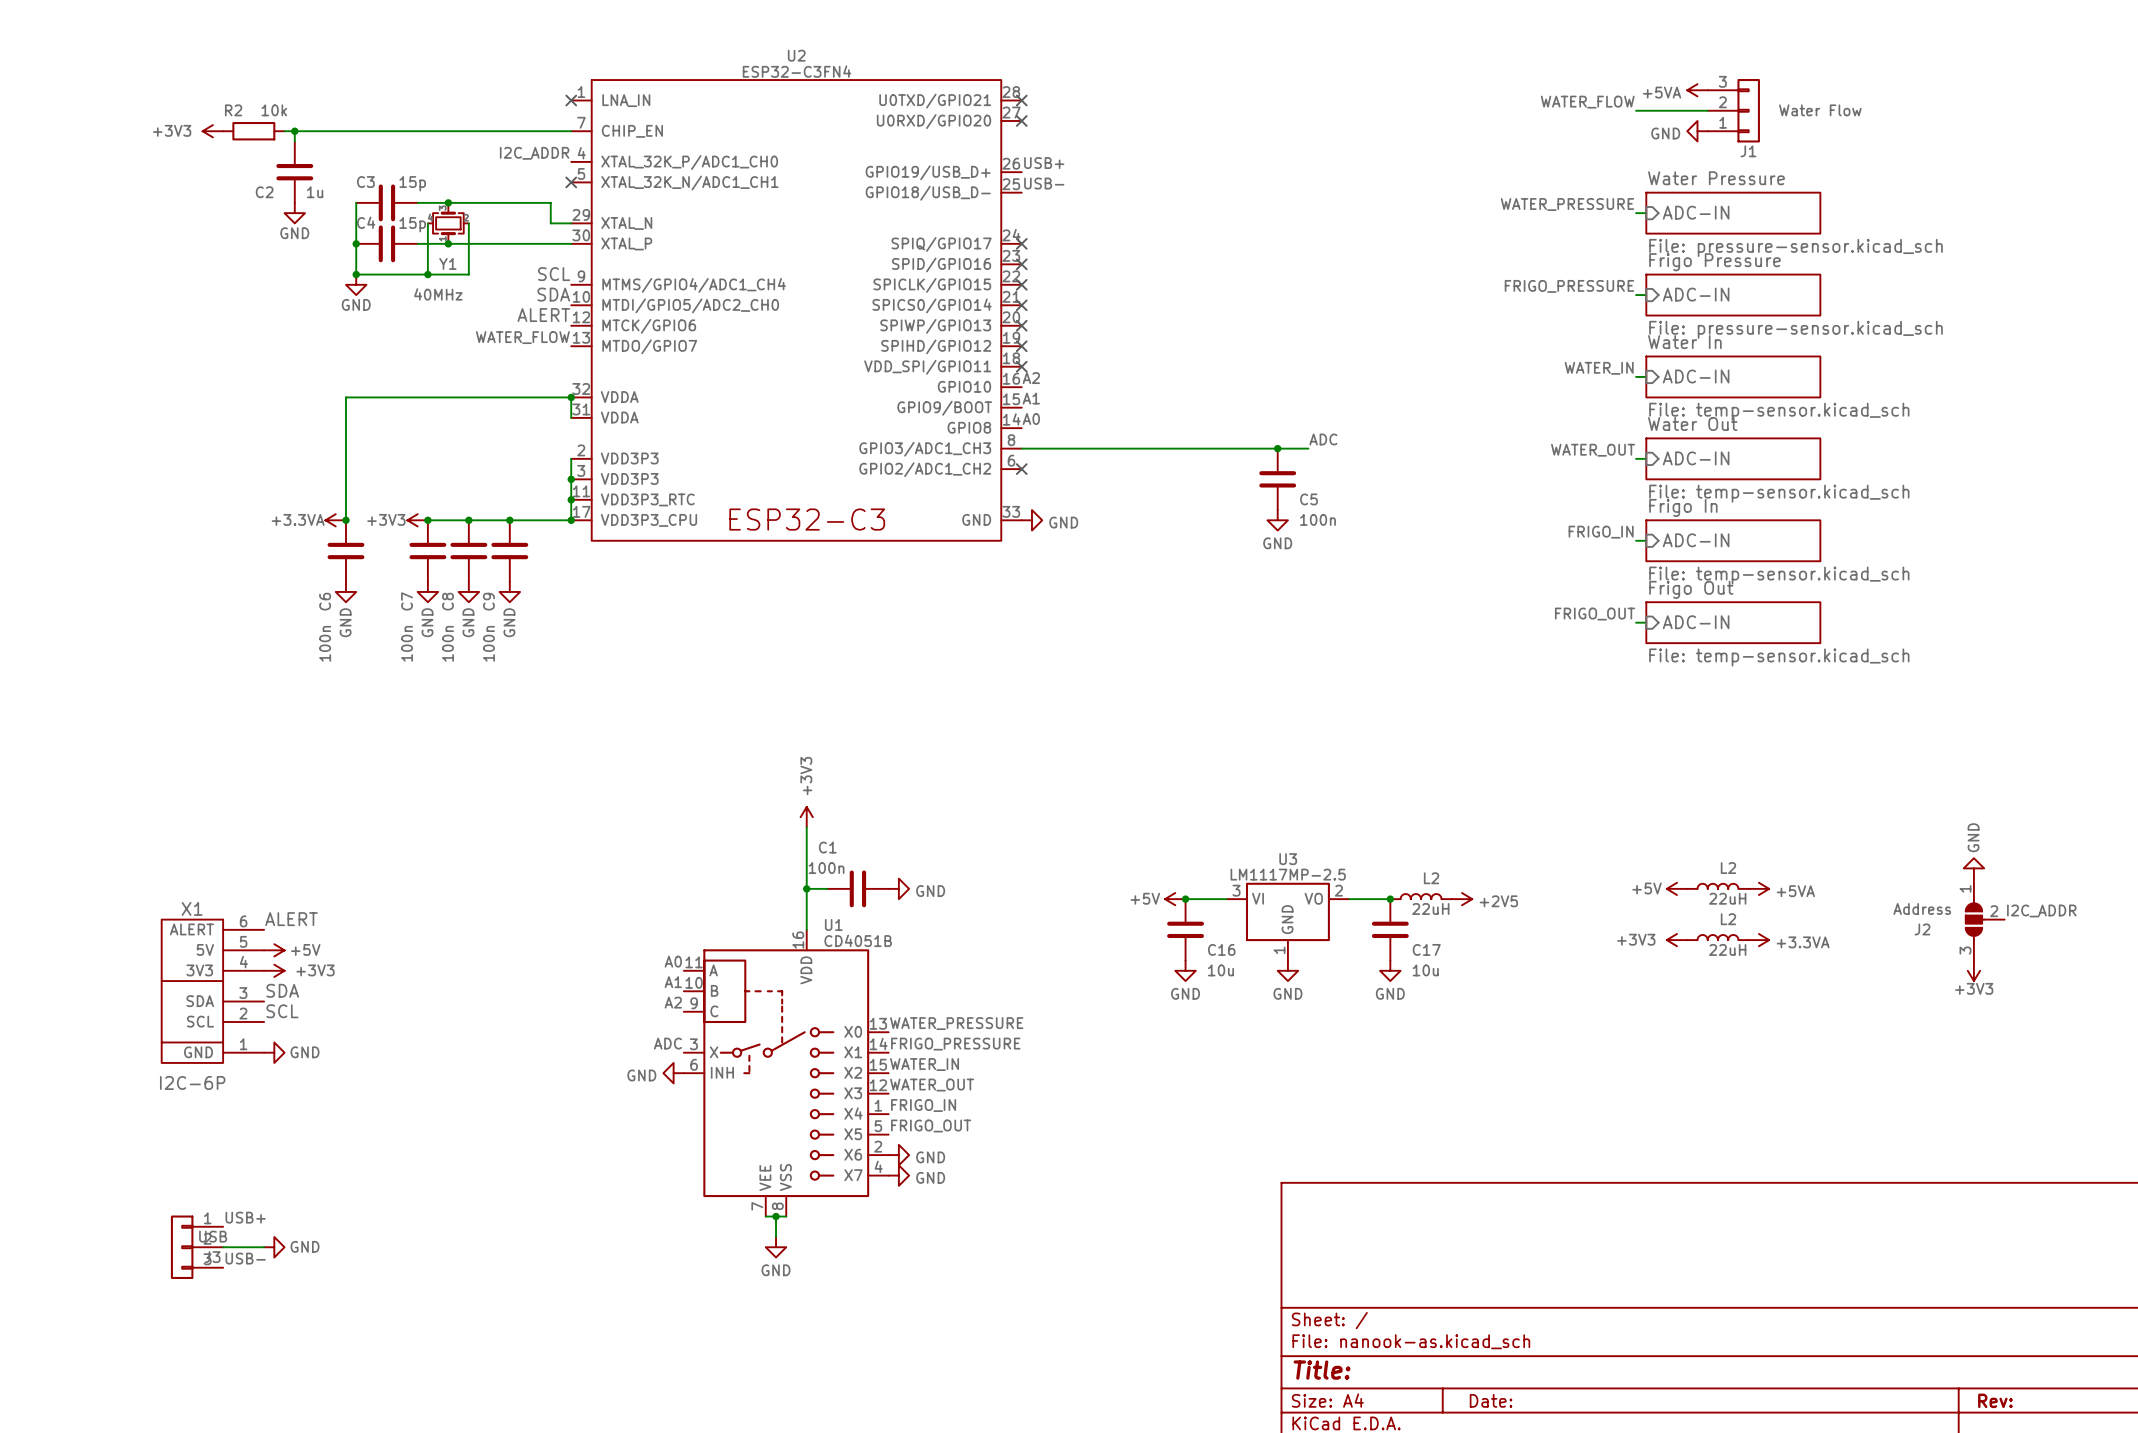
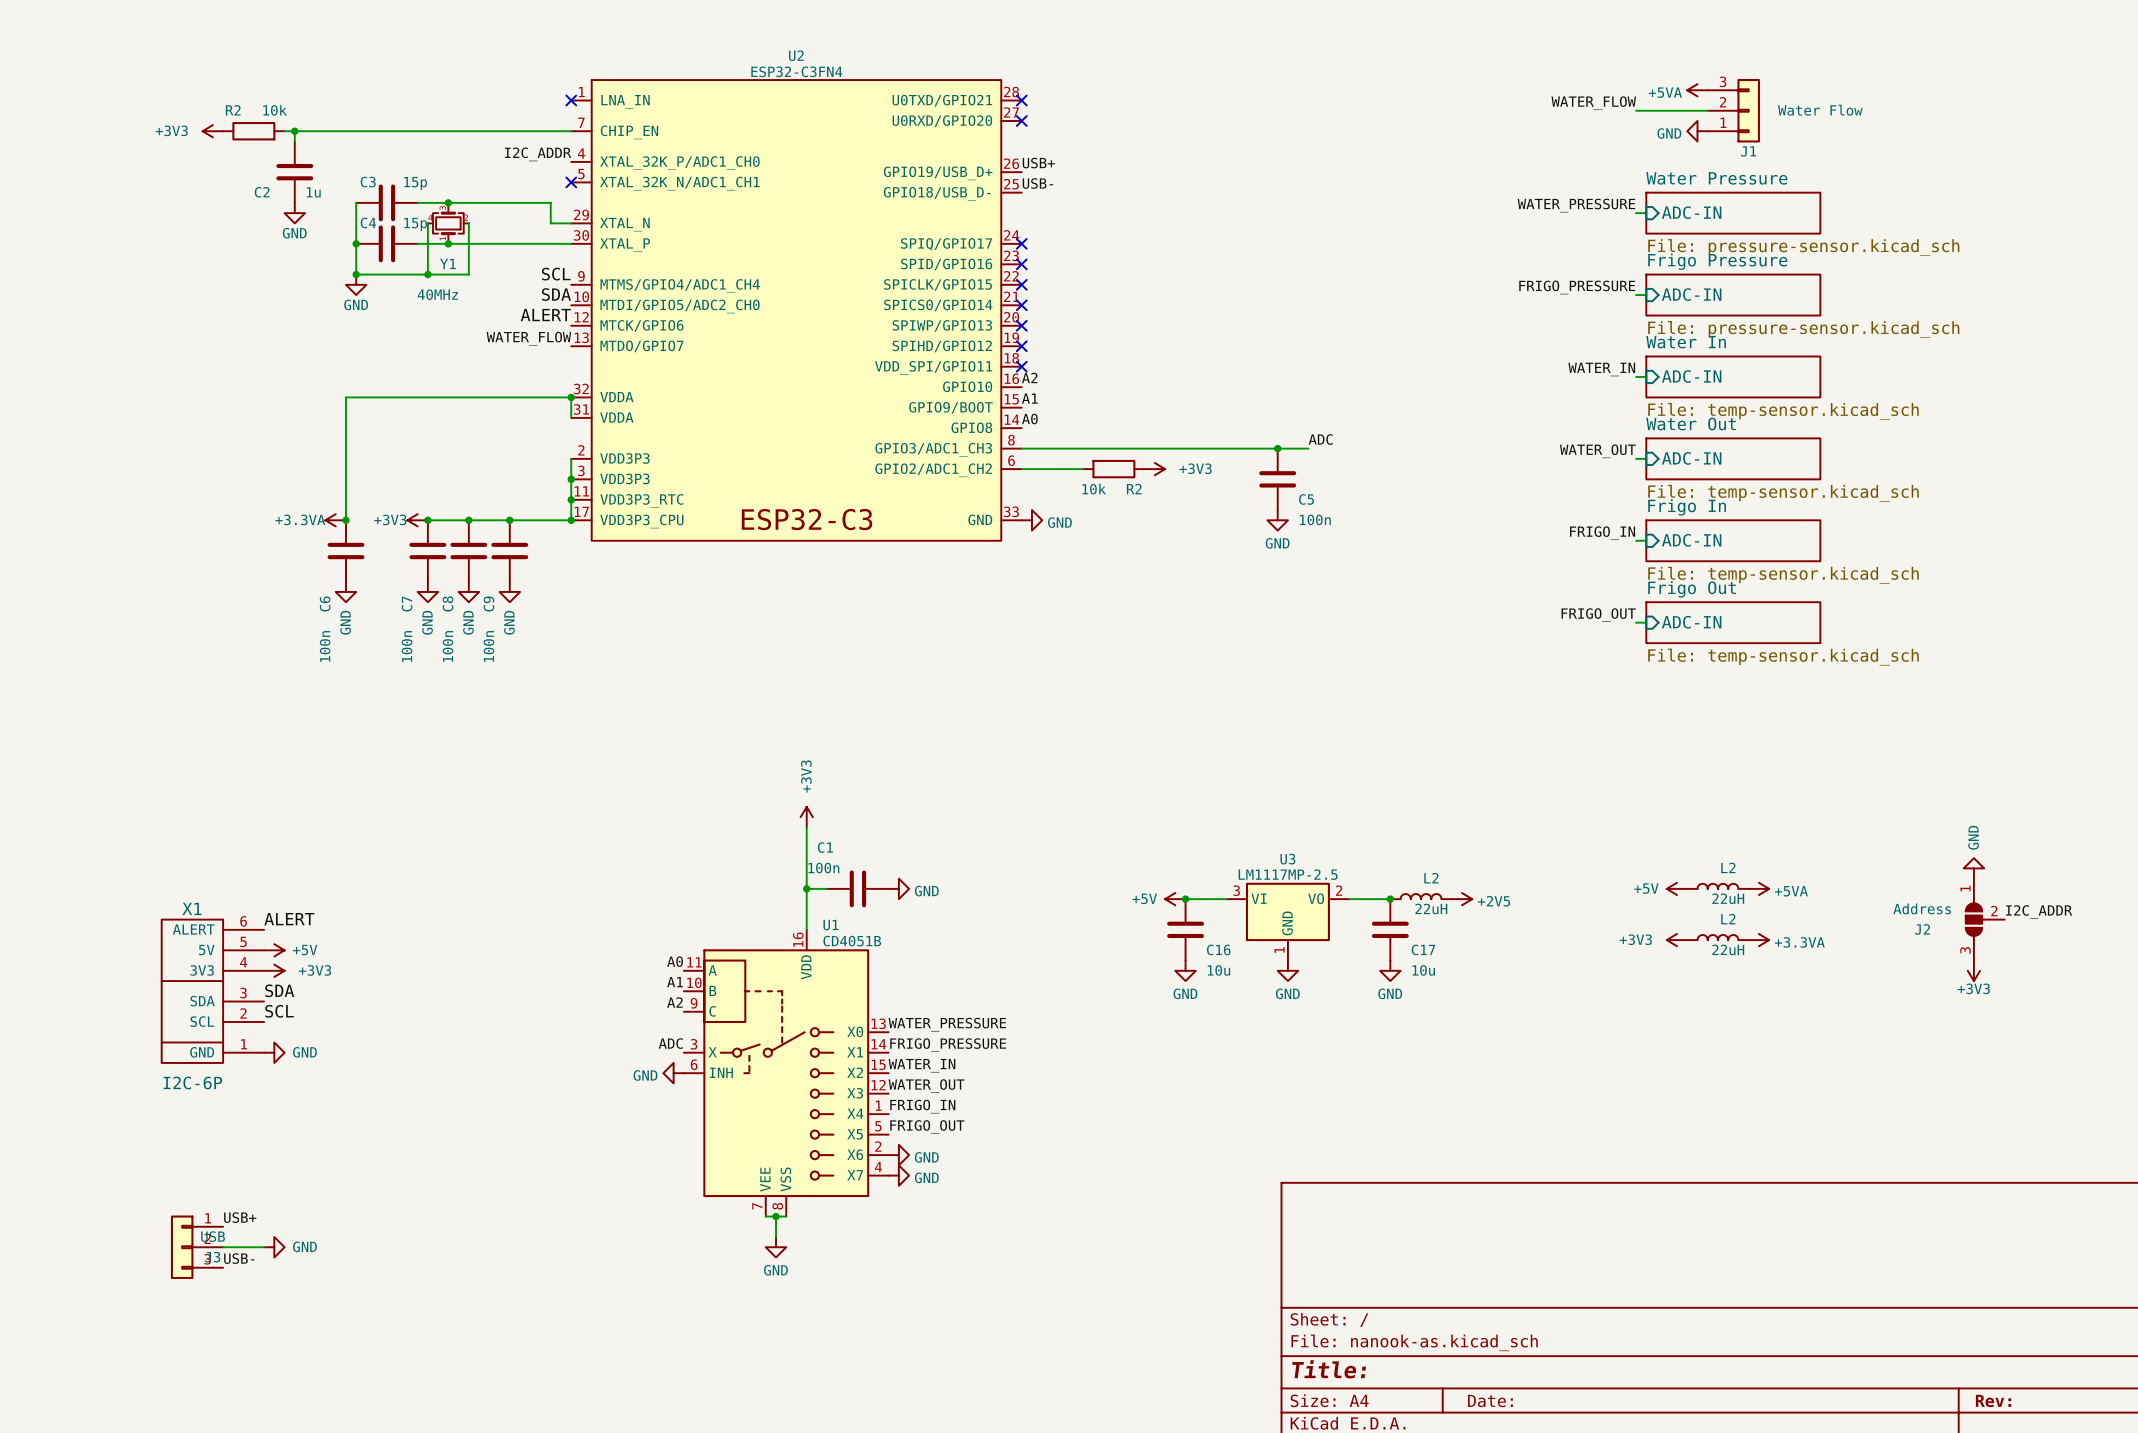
wire: none -> (1021, 469) (1083, 469)
no-connect mark: (1021, 469) -> none
R2: none -> 10k (1113, 469)
power symbol: none -> +3V3 (1154, 469)

